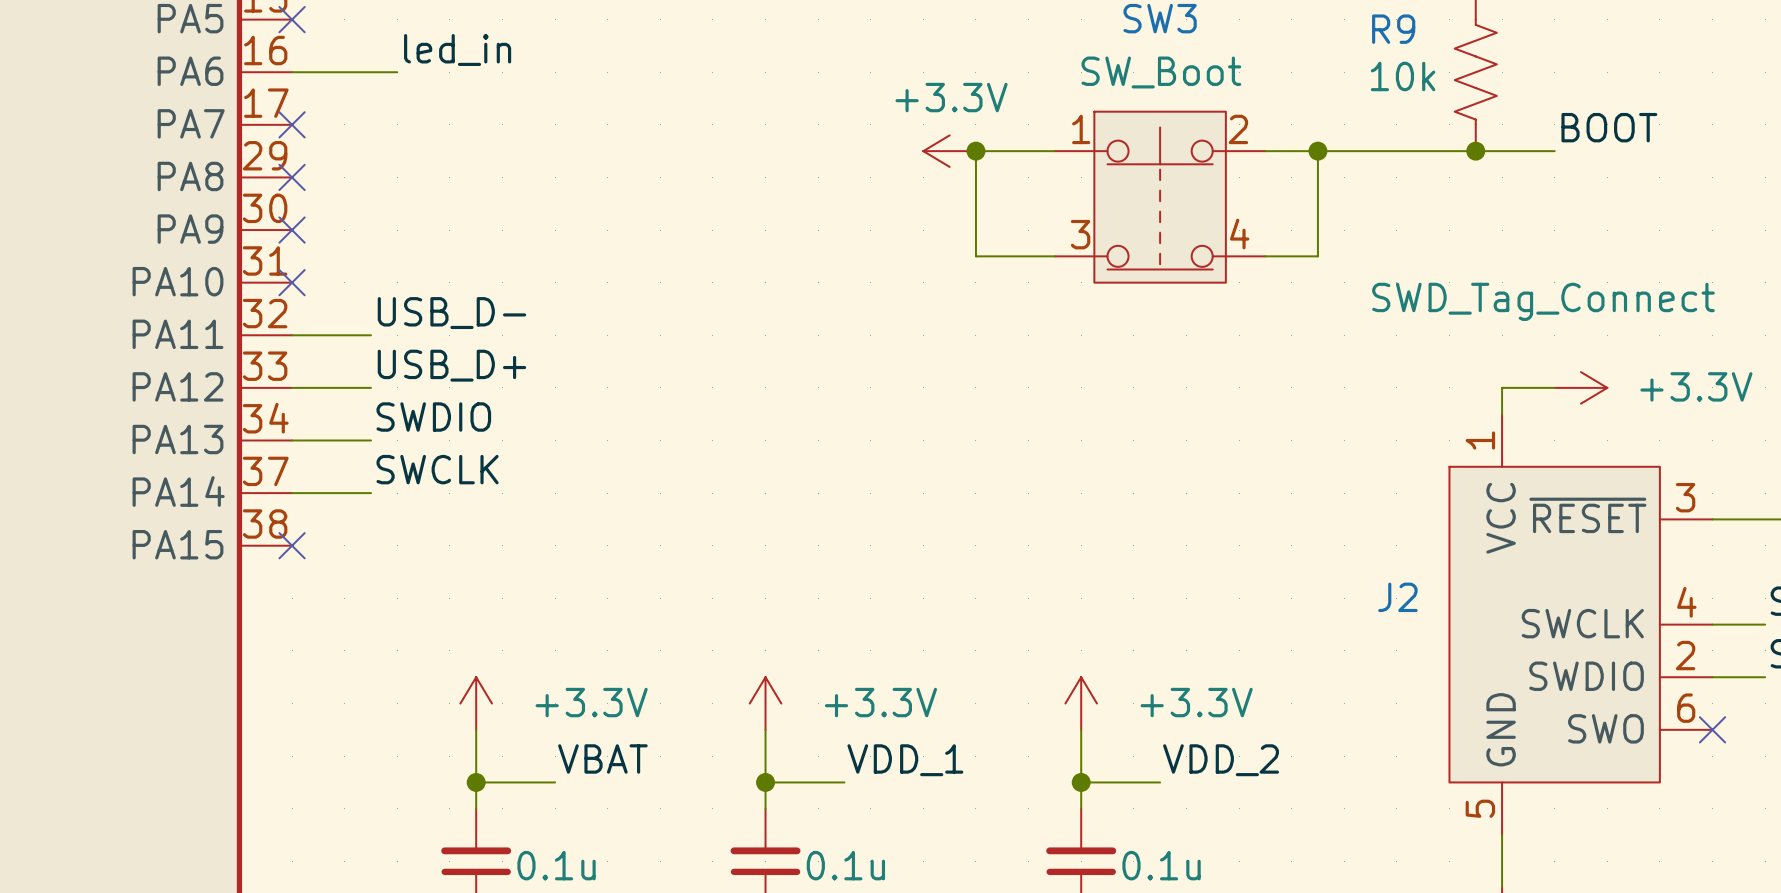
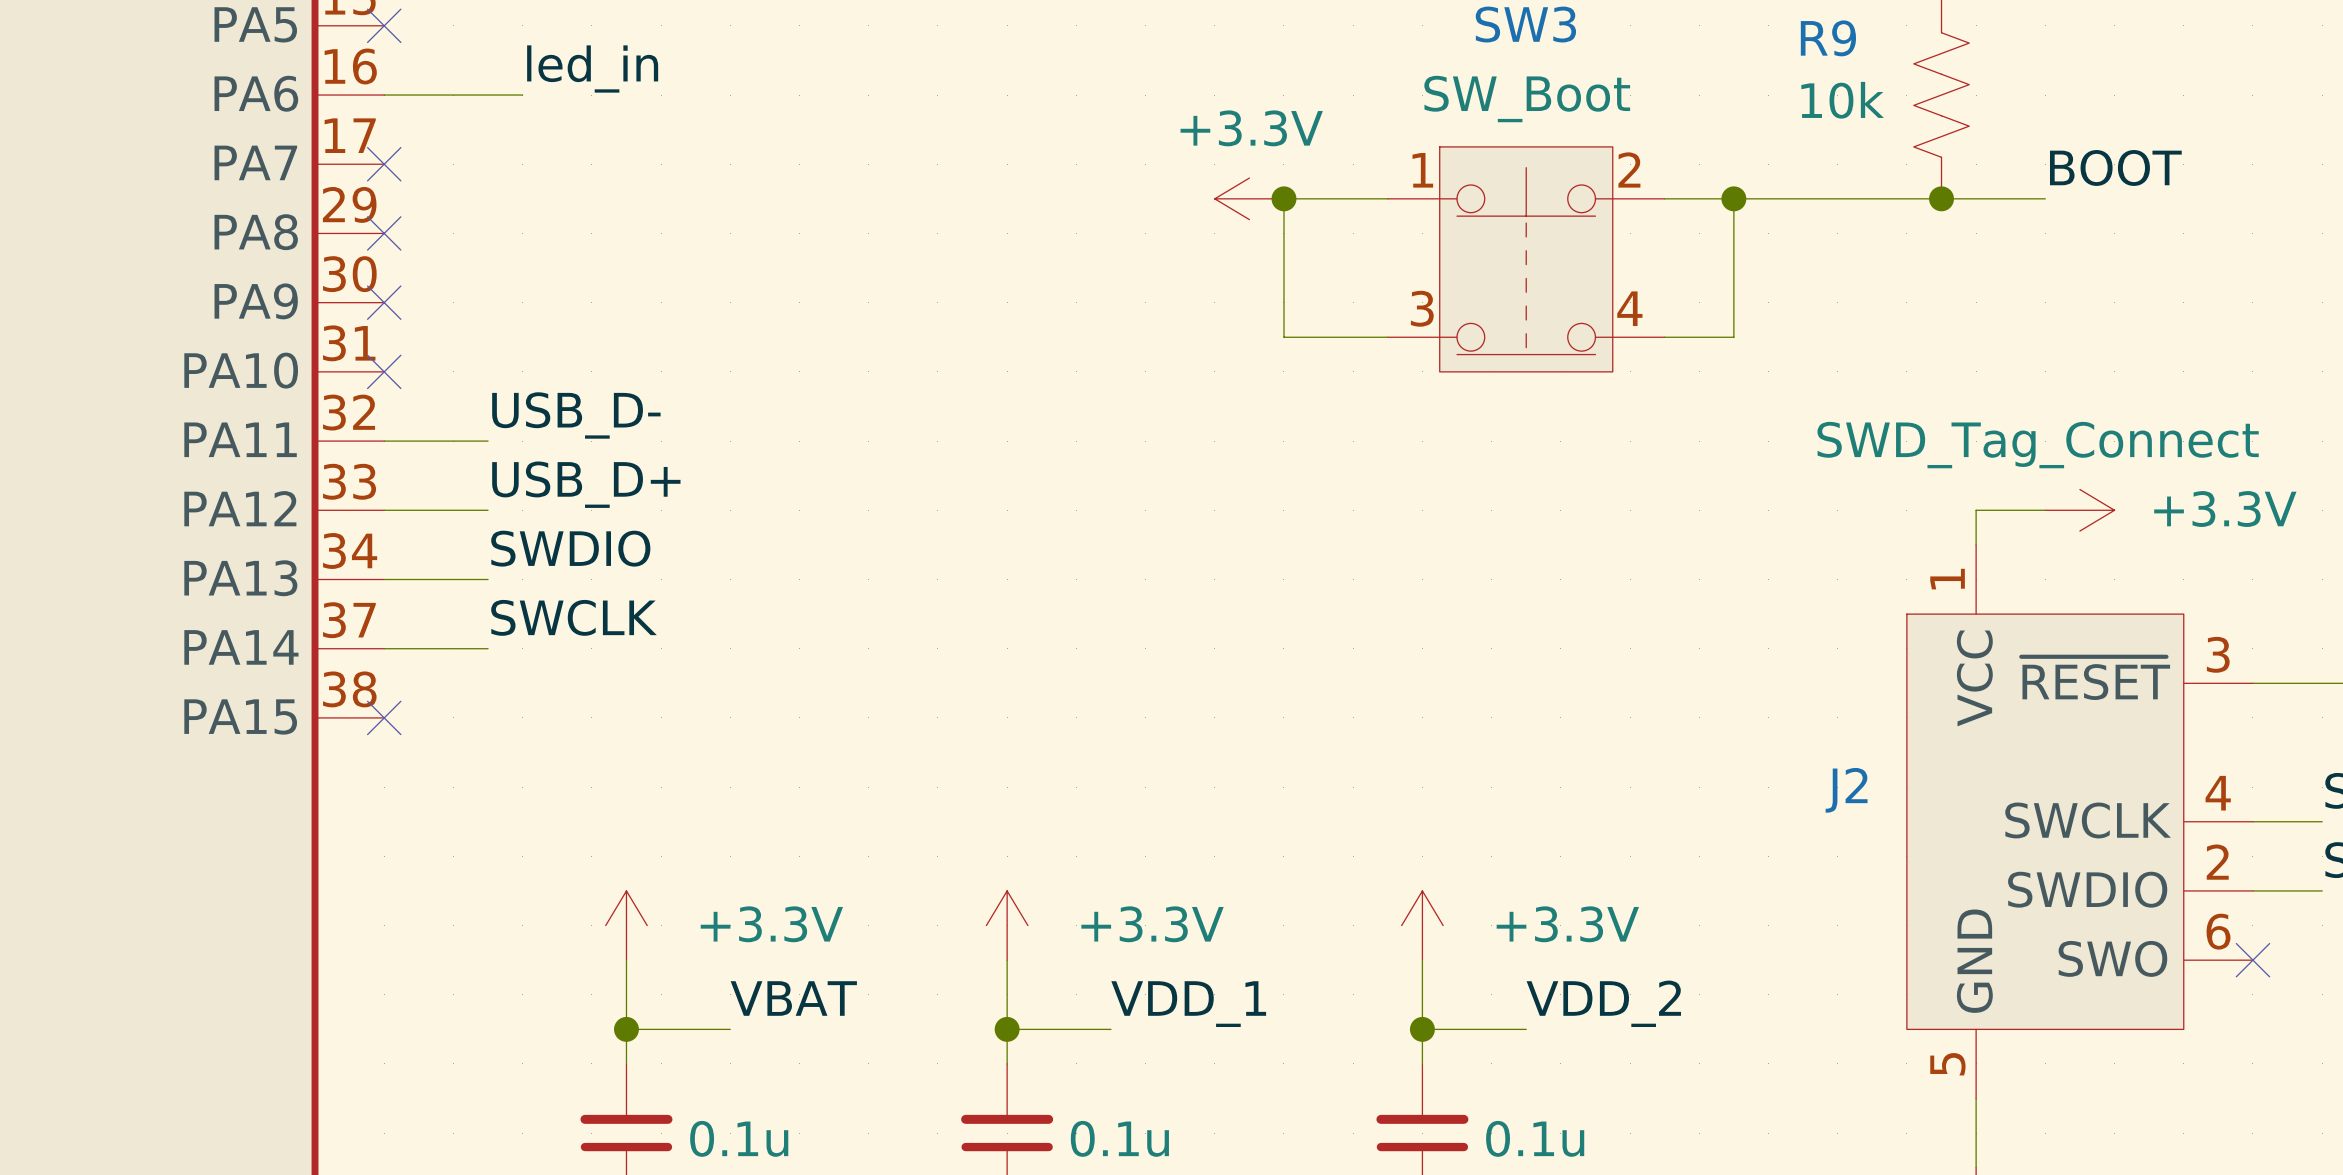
J2 value position: SWD_Tag_Connect (1543, 301) -> SWD_Tag_Connect (2038, 445)

